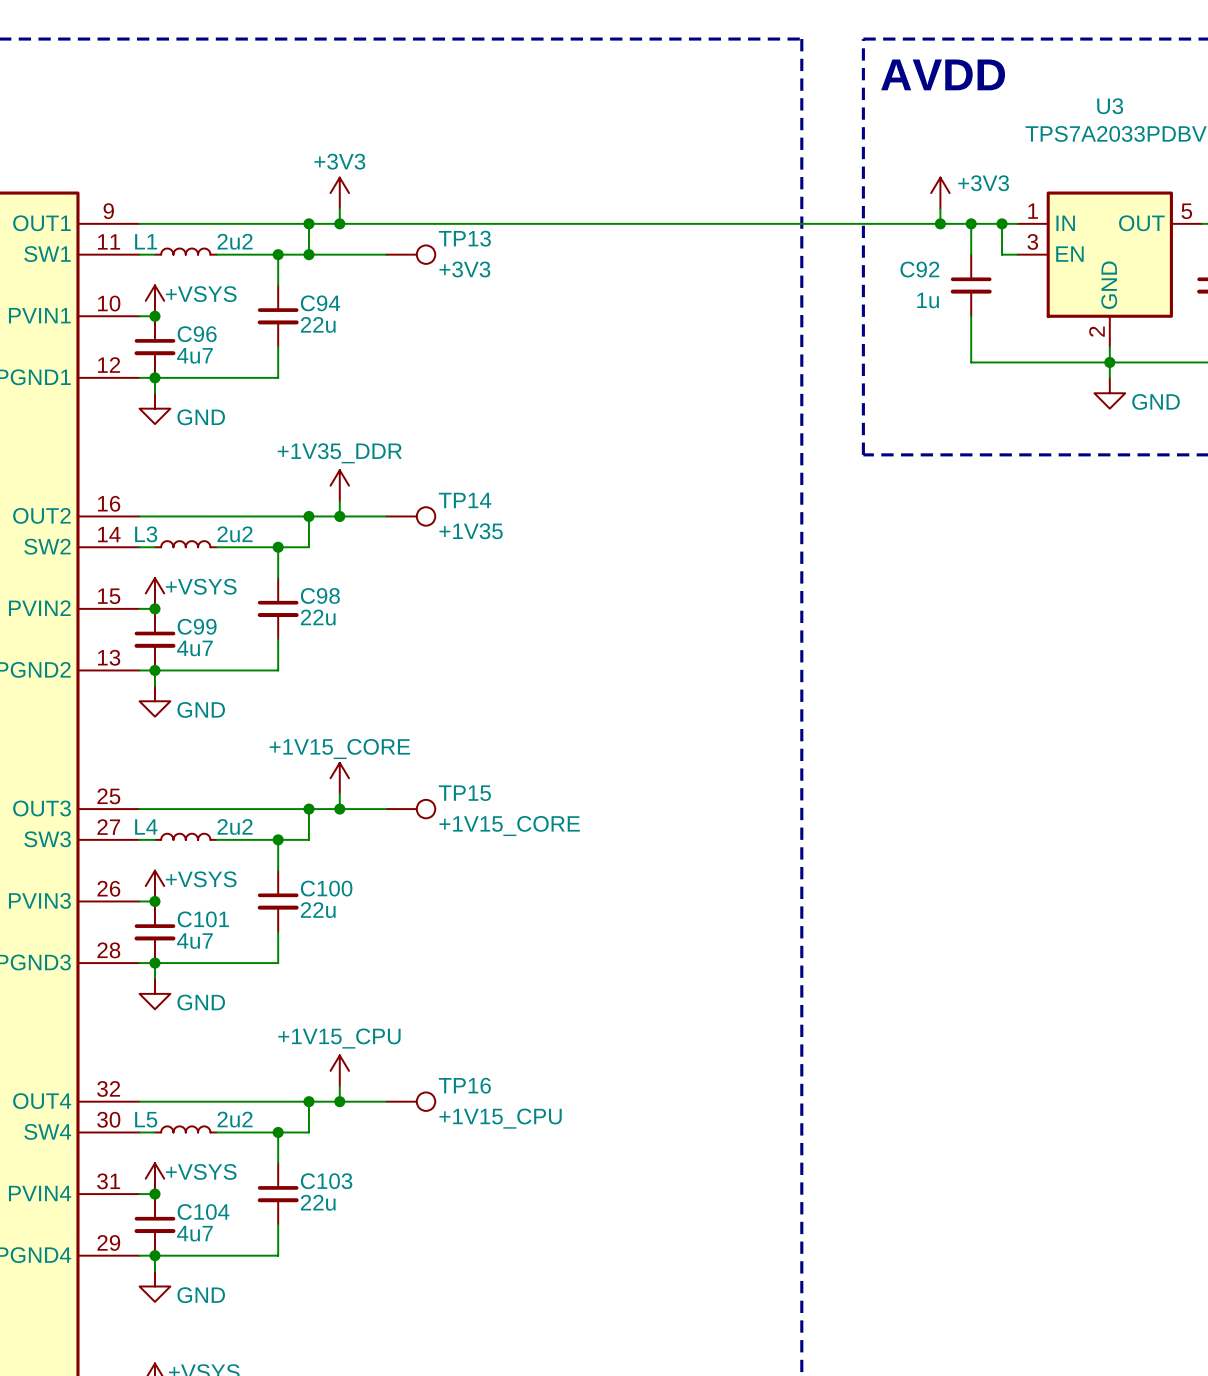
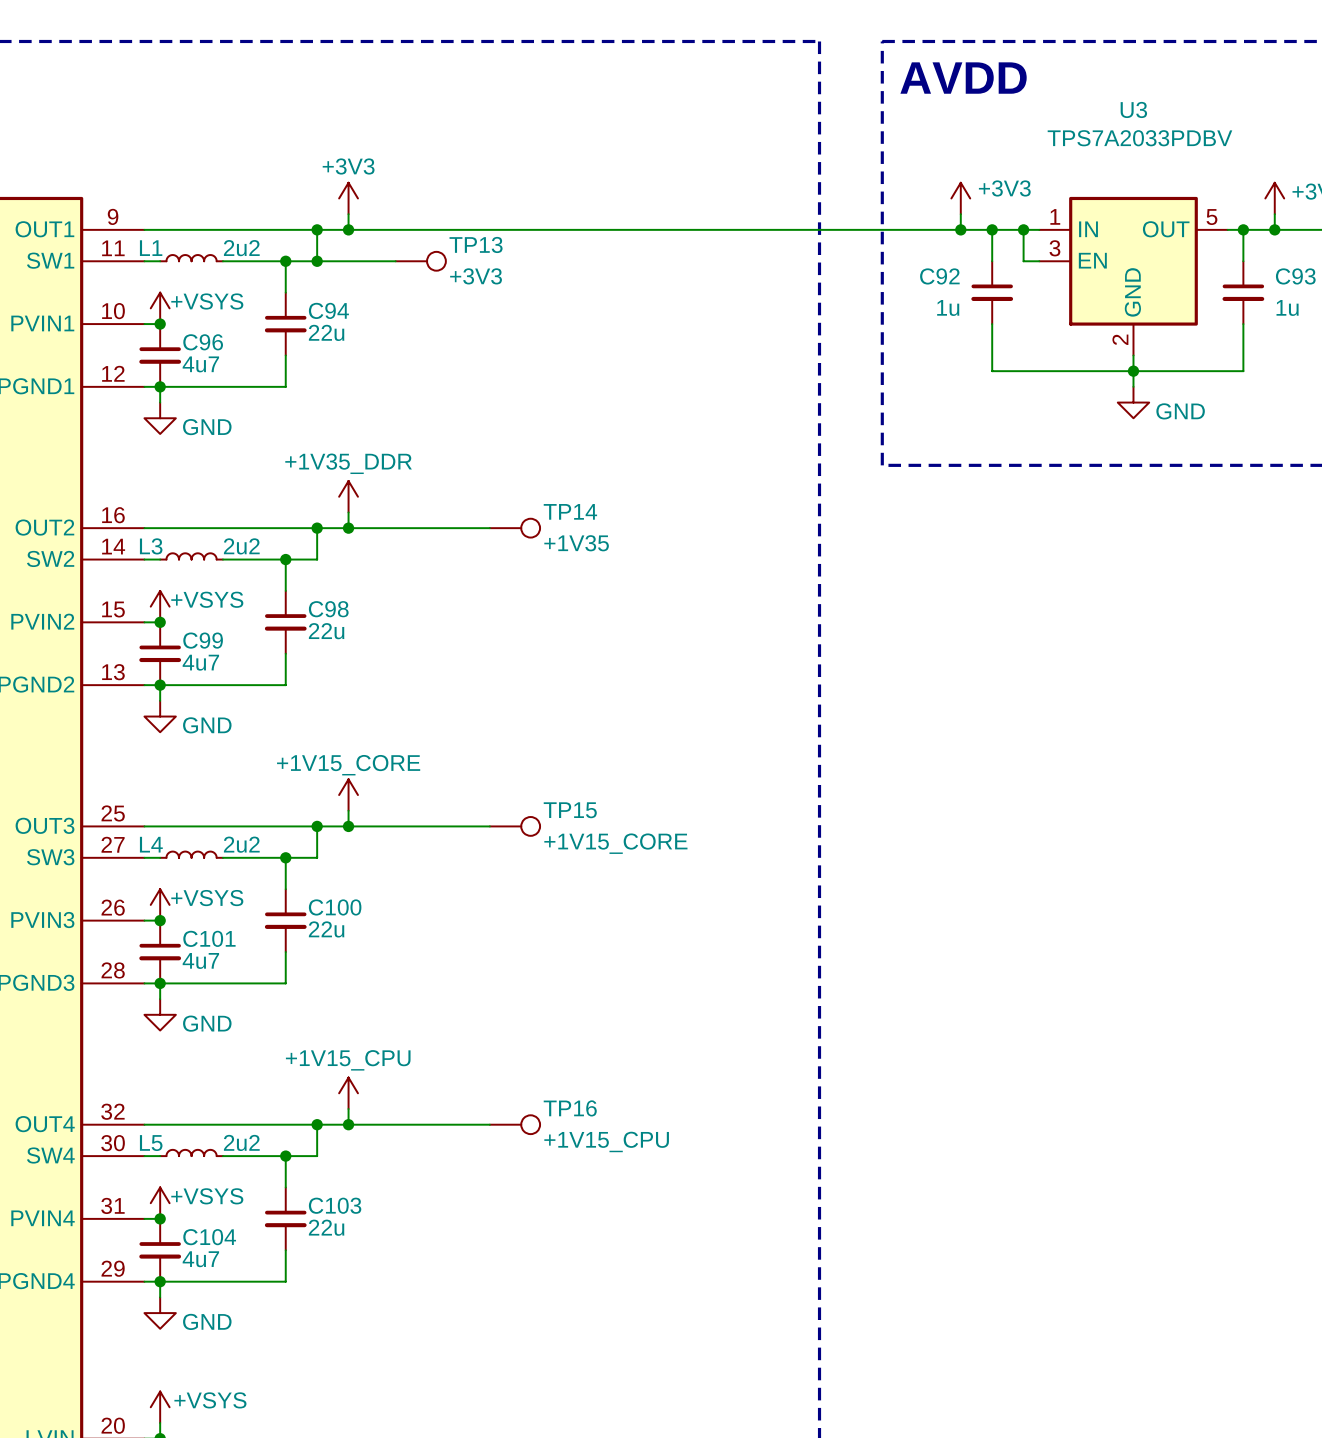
wire: none -> (395, 528) (489, 528)
TP14 position: (410, 516) -> (514, 528)
wire: none -> (395, 826) (489, 826)
TP15 position: (410, 809) -> (514, 826)
wire: none -> (395, 1124) (489, 1124)
TP16 position: (410, 1101) -> (514, 1124)

